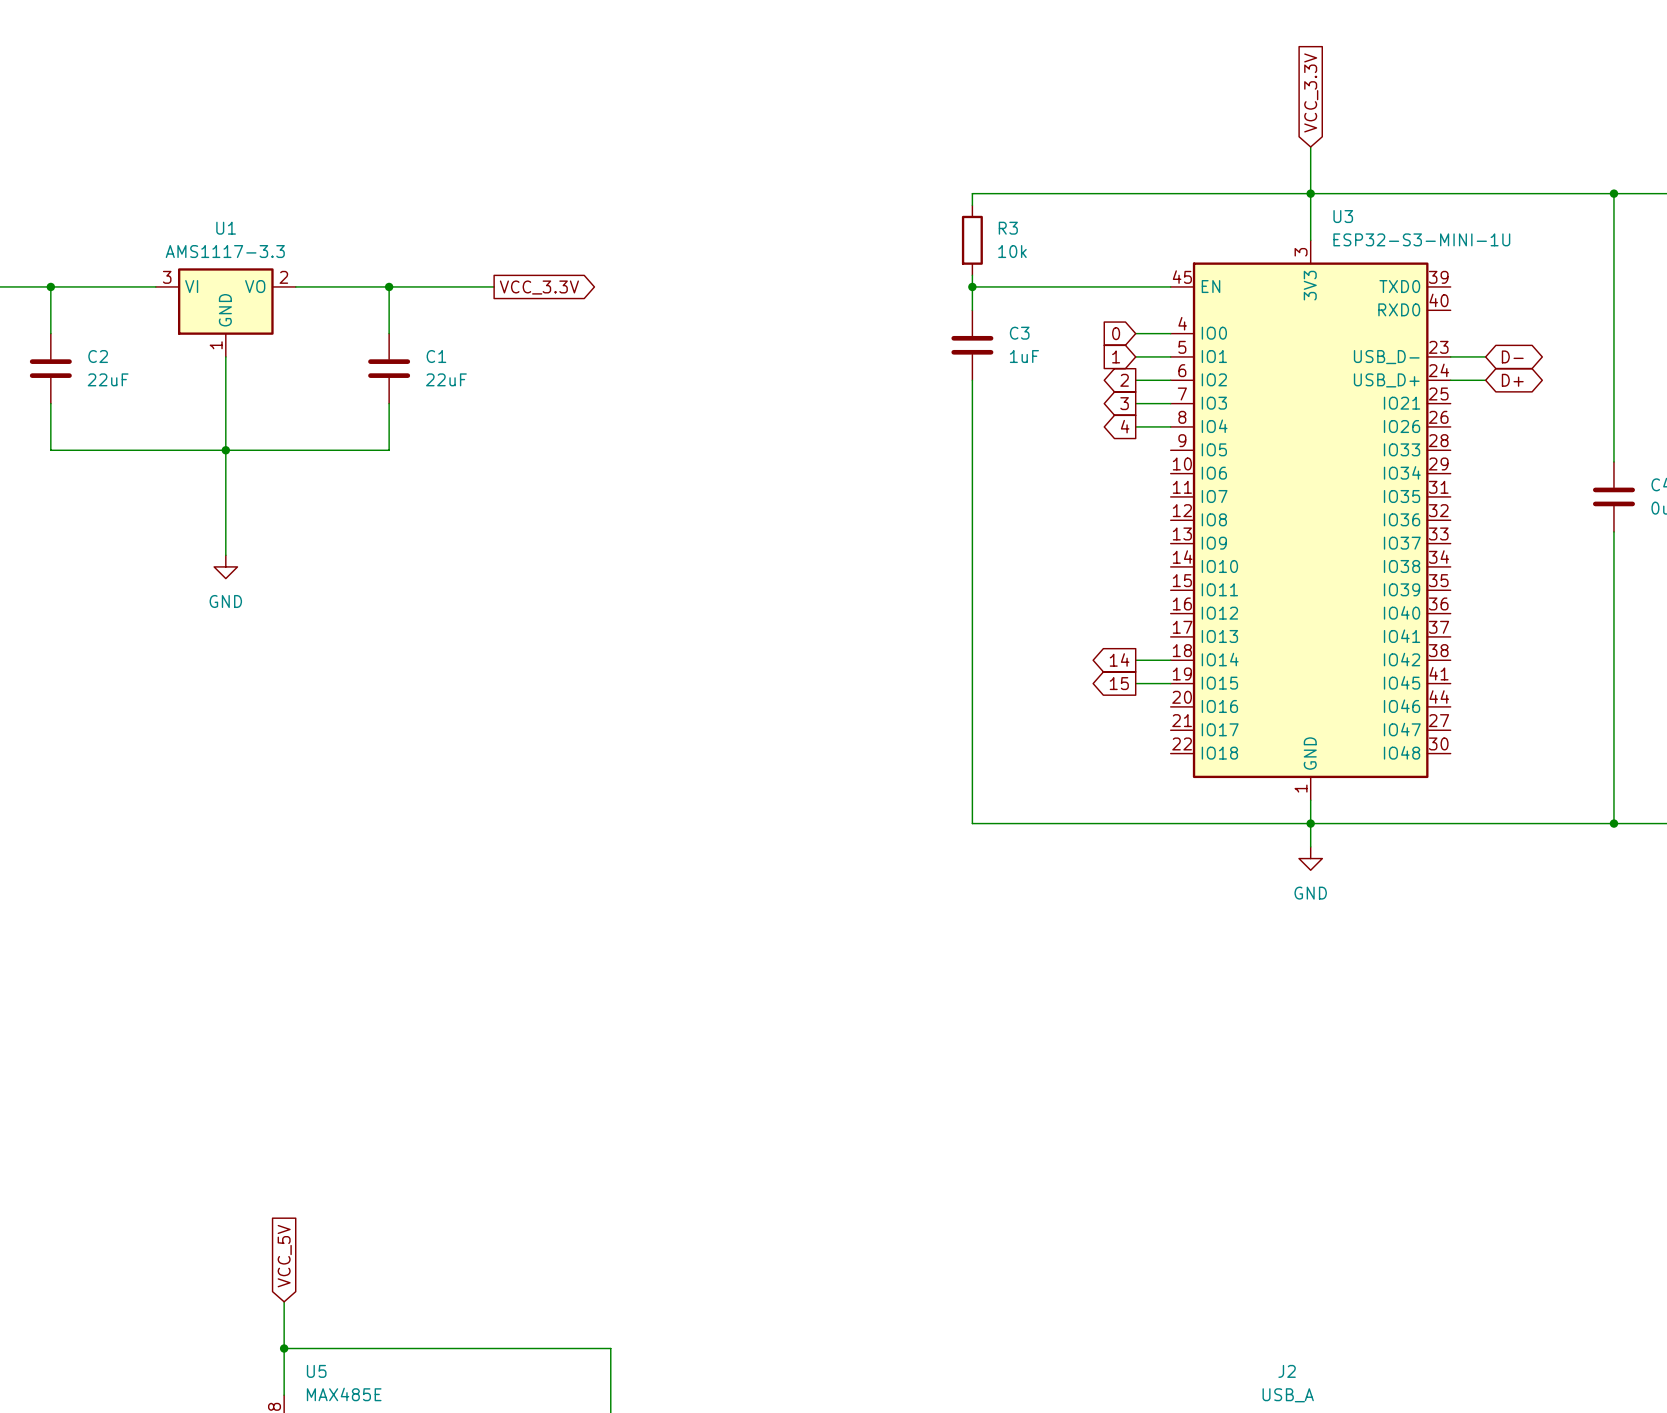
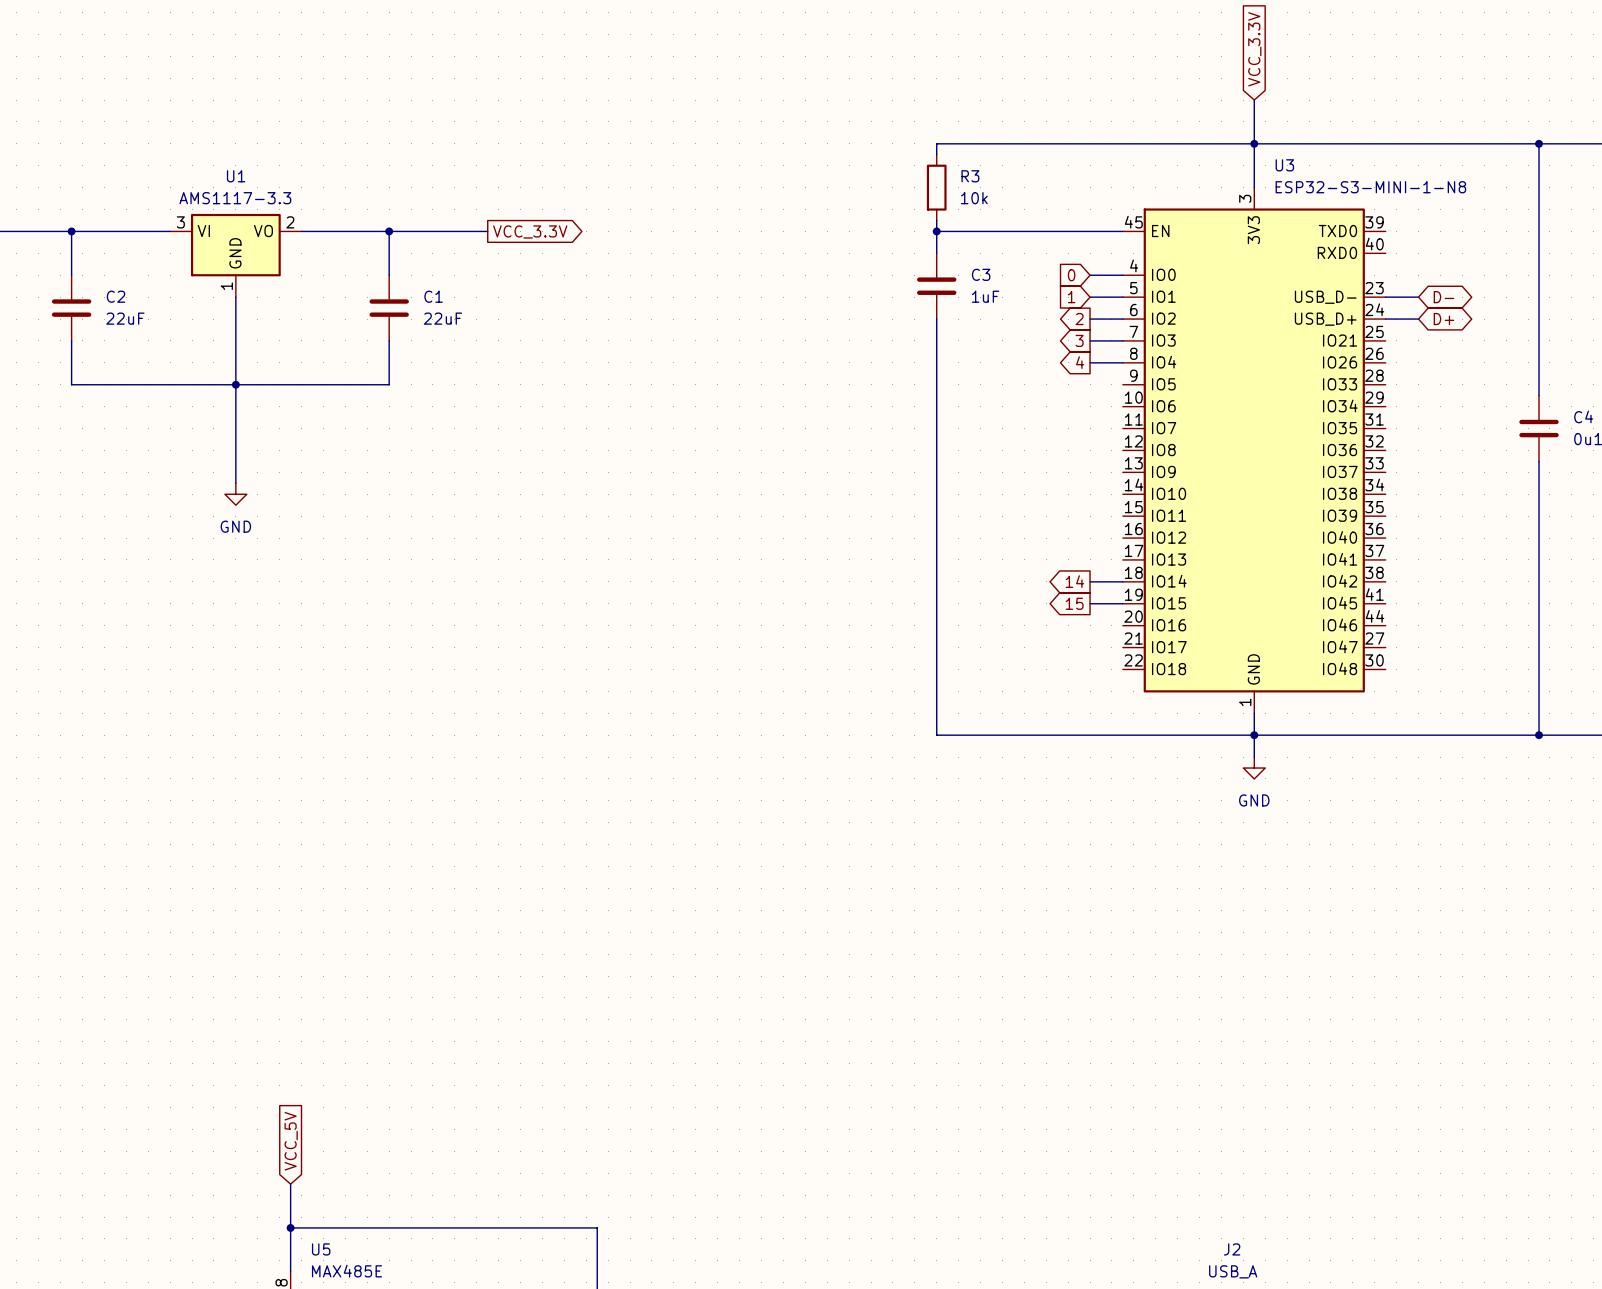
U3 value: ESP32-S3-MINI-1U (1421, 239) -> ESP32-S3-MINI-1-N8 (1370, 187)

